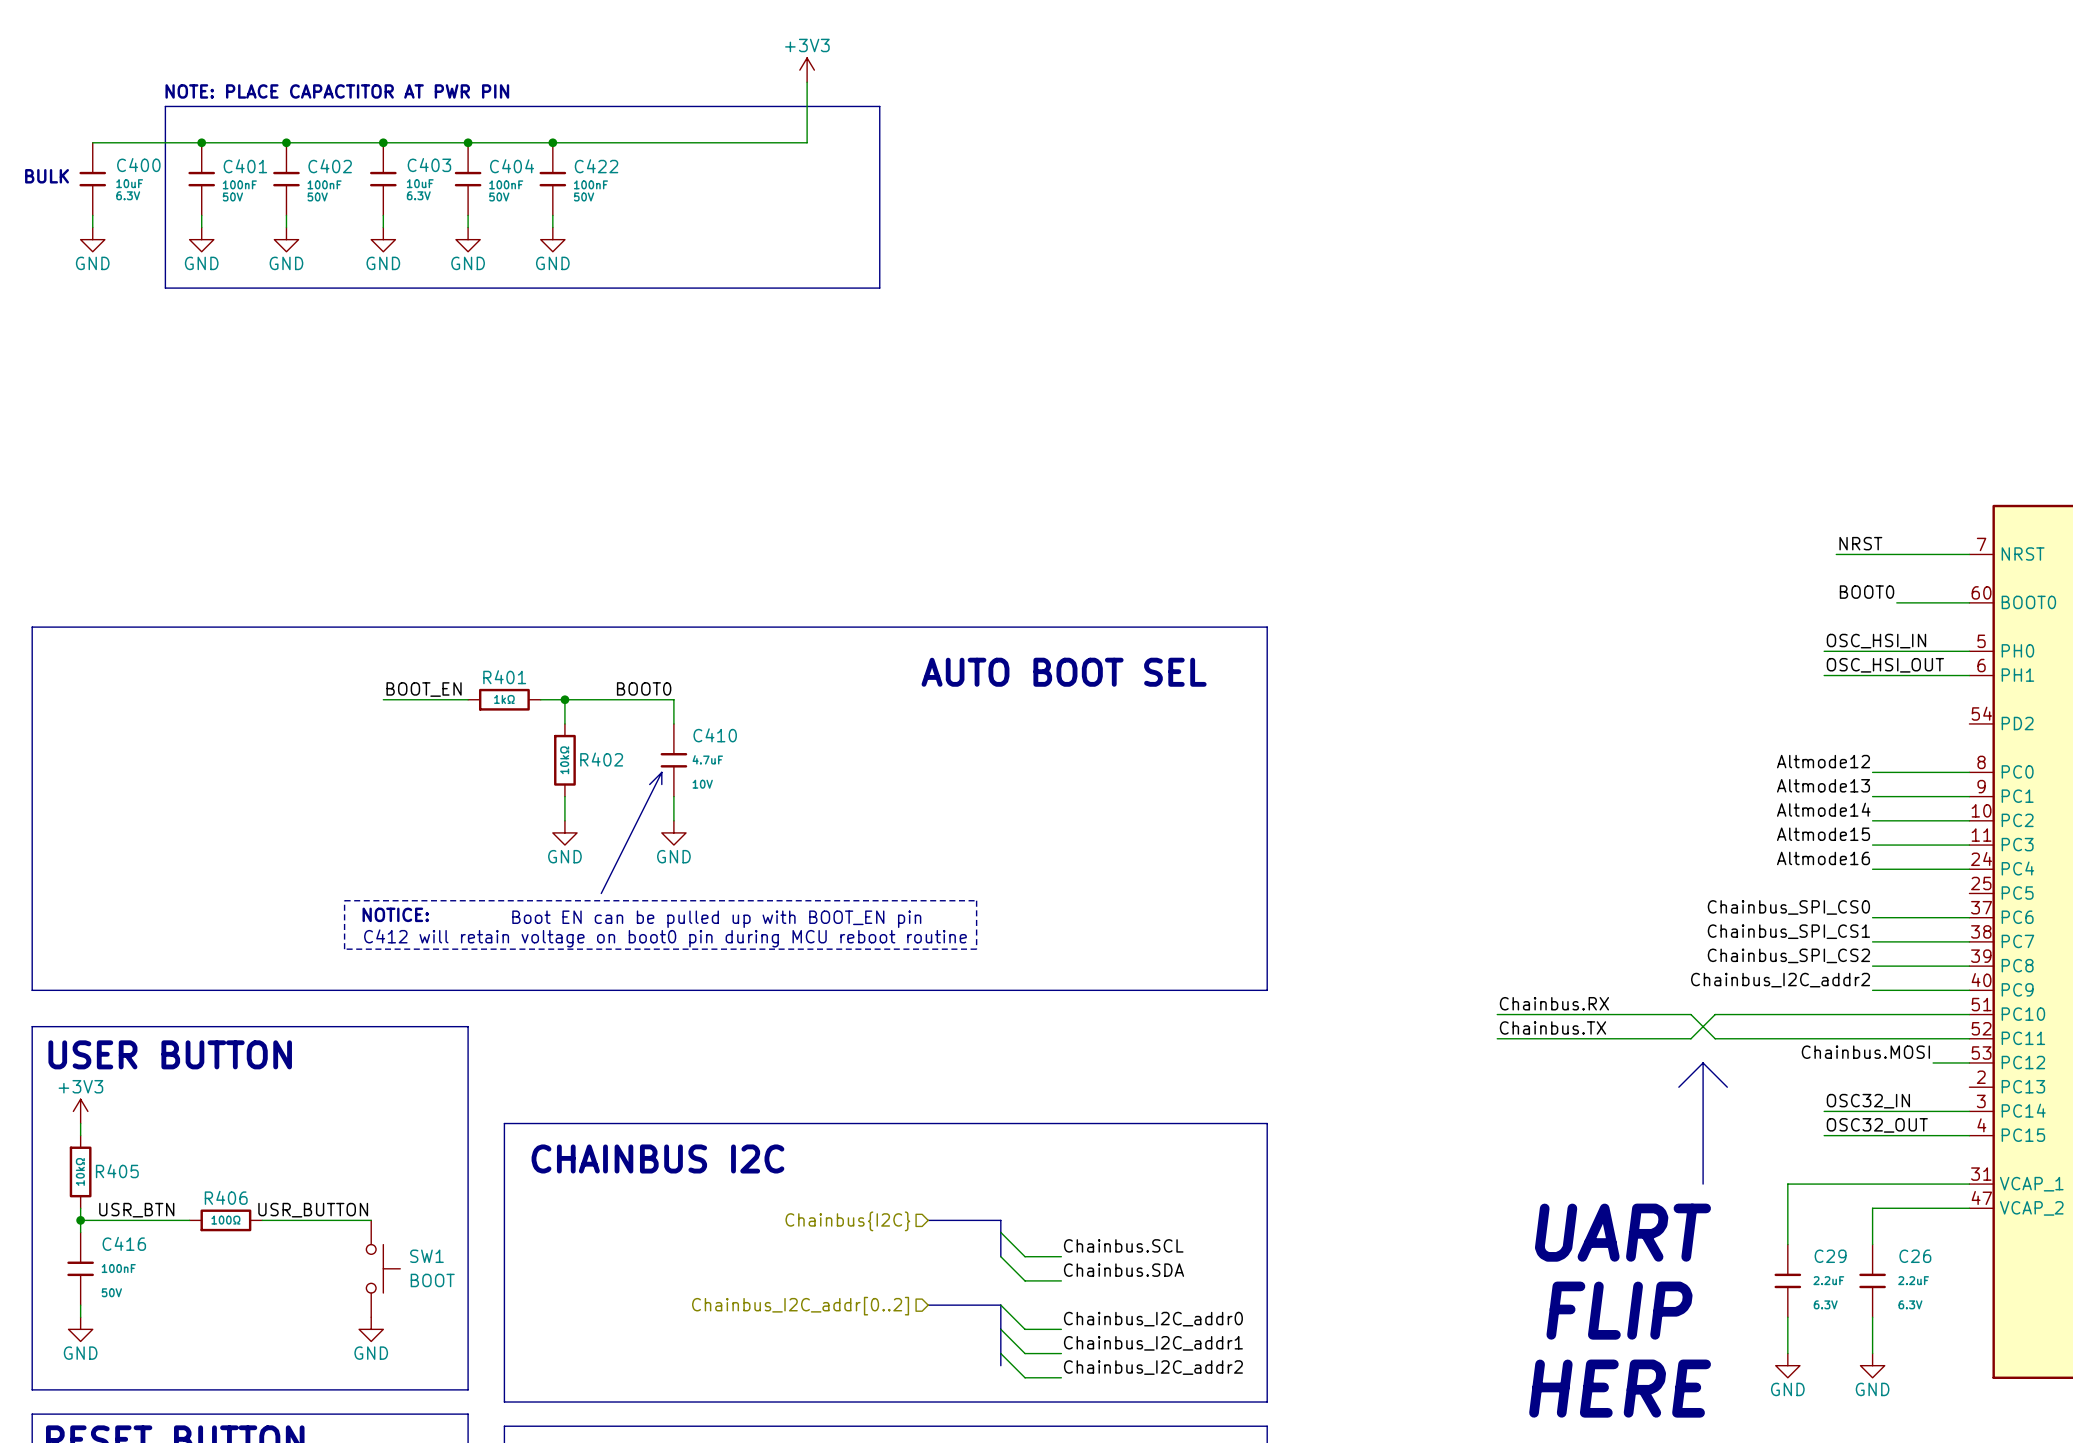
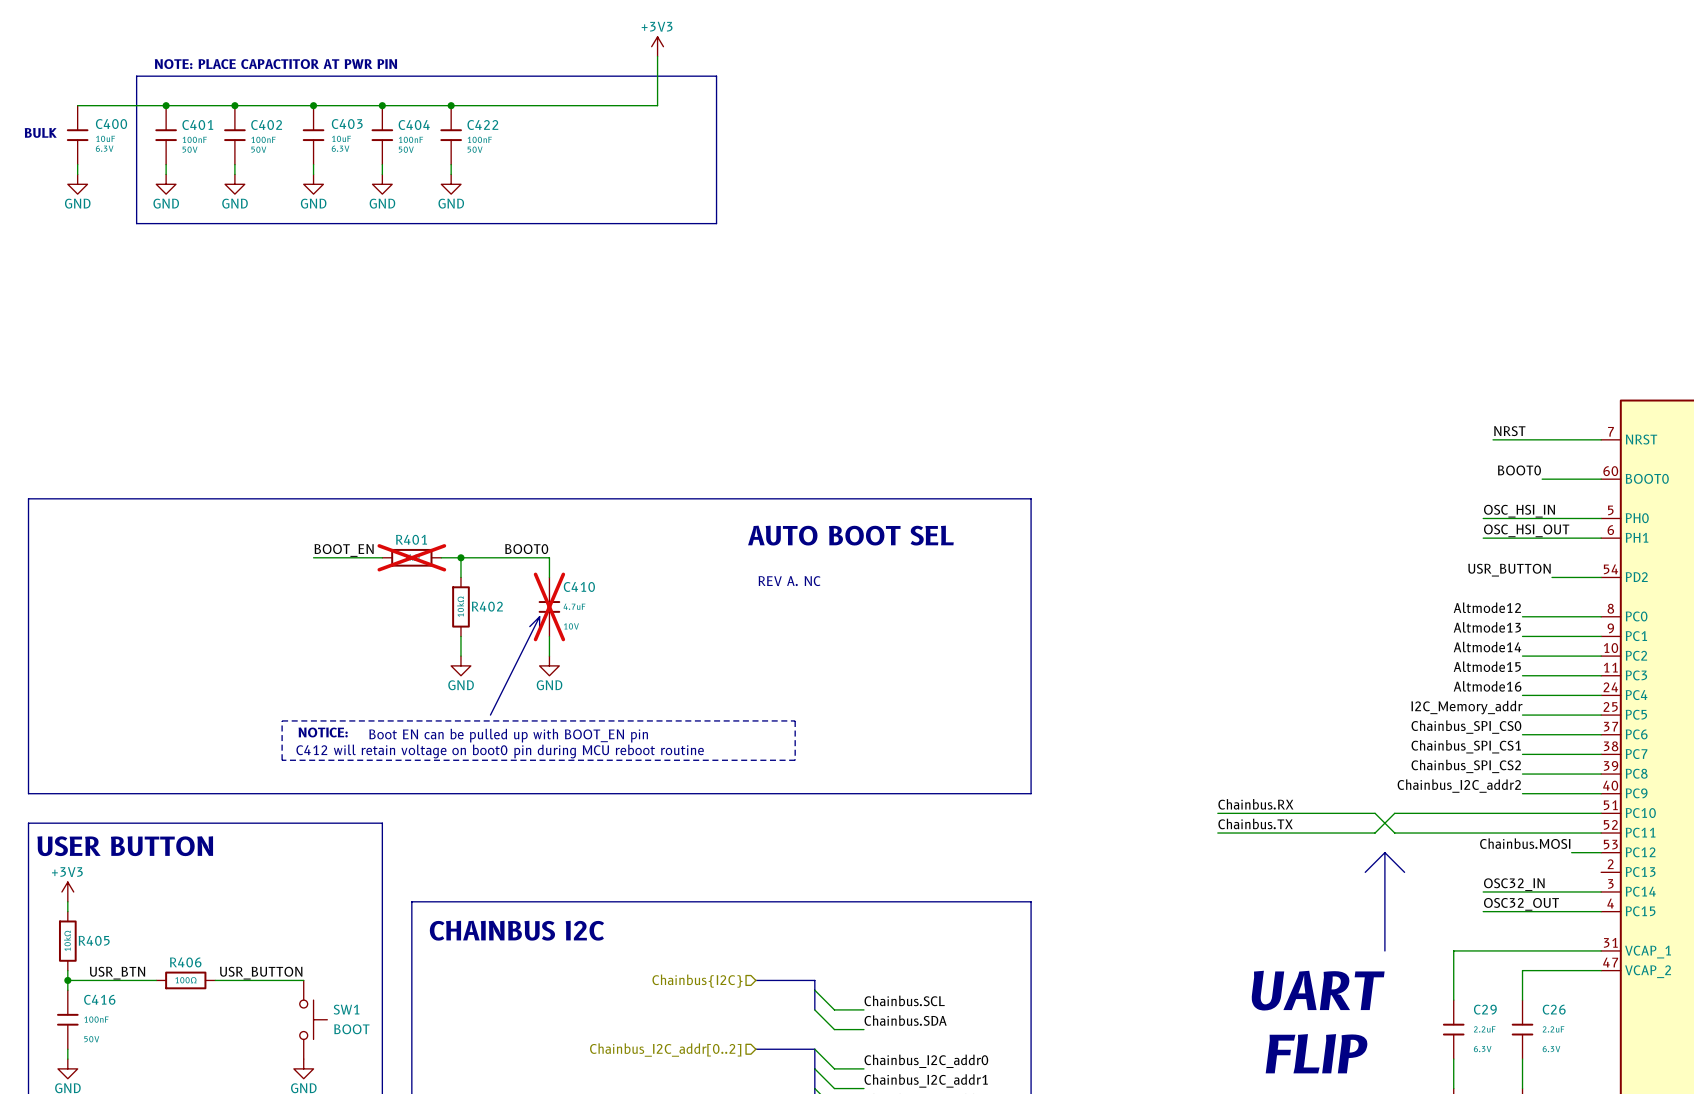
R401 do-not-place cross: none -> (411, 557)
label: none -> USR_BUTTON (1509, 570)
wire: none -> (1552, 577) (1601, 577)
text: none -> REV A. NC (789, 581)
C410 do-not-place cross: none -> (549, 606)
label: none -> I2C_Memory_addr (1466, 707)
wire: none -> (1522, 715) (1601, 715)

